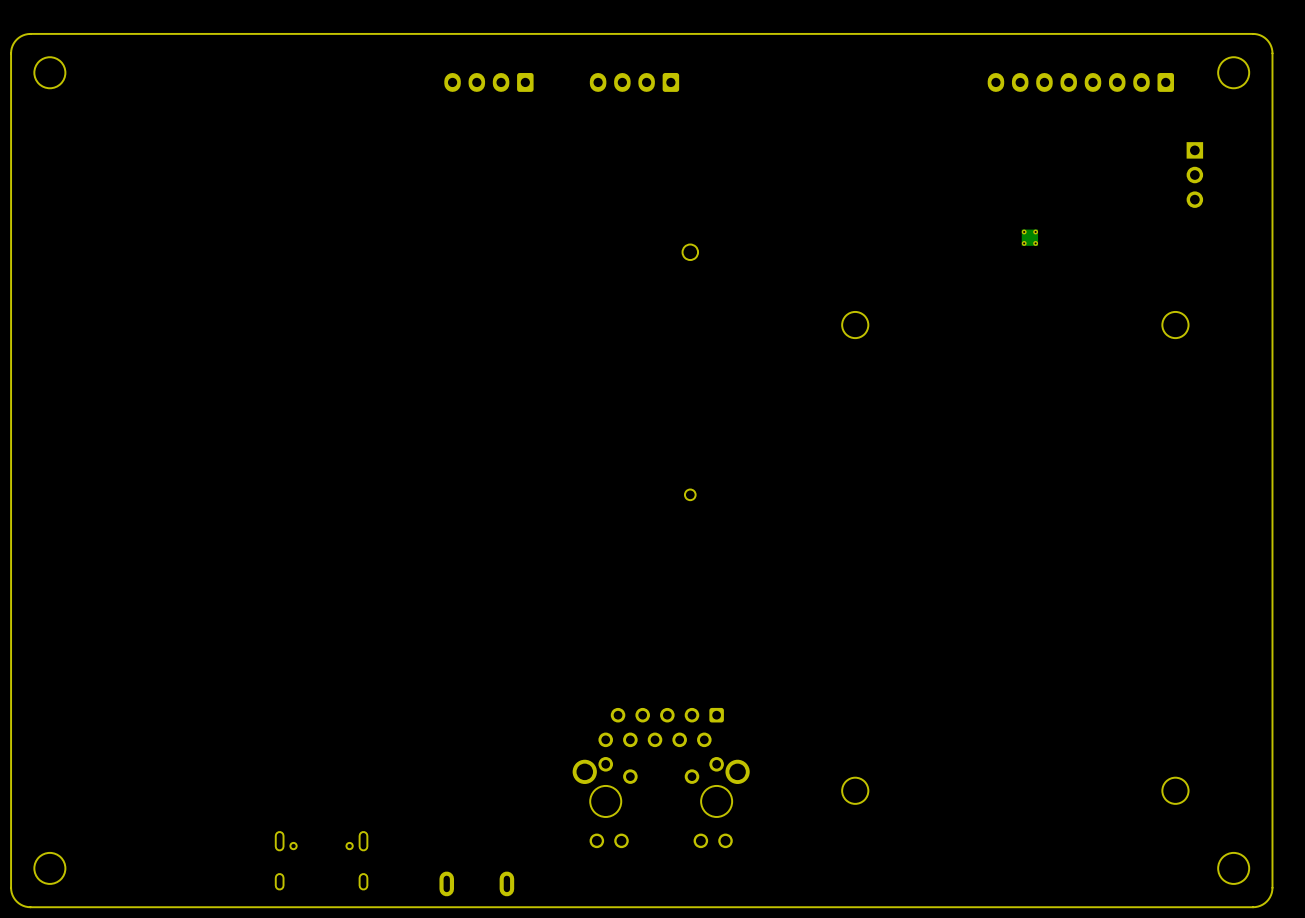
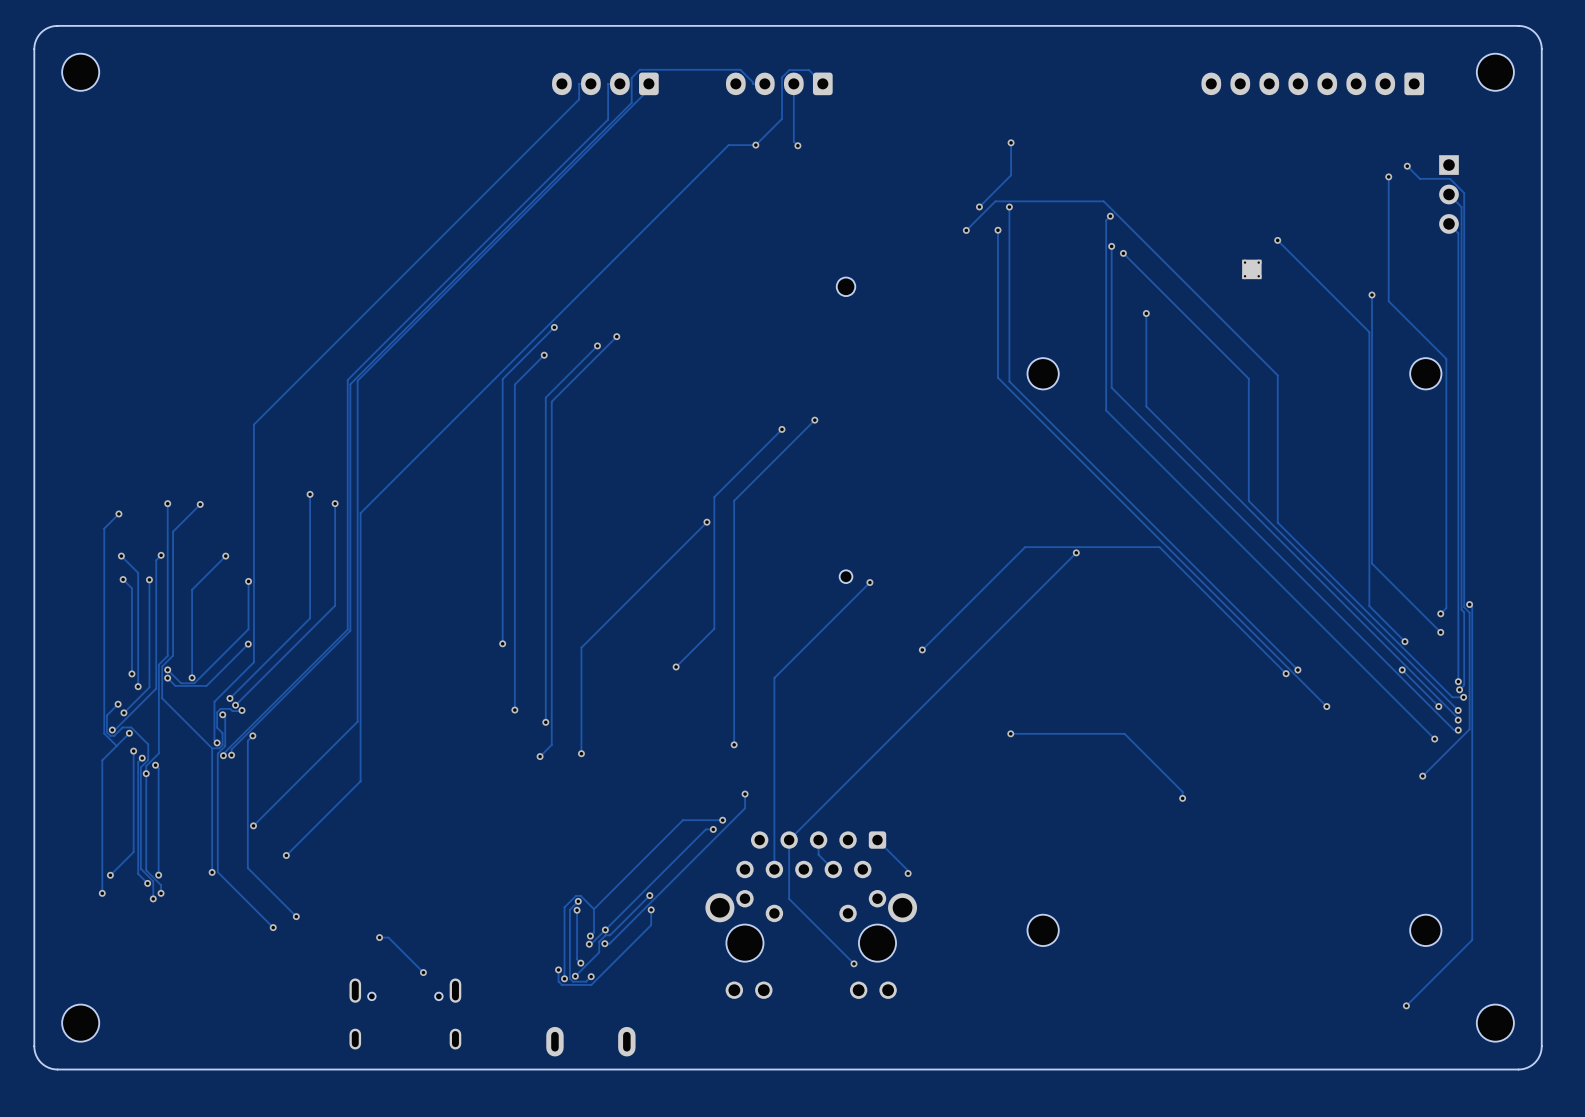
track: none -> (590, 83) (579, 83) (579, 99) (253, 424) (253, 662) (214, 701) (214, 740) (217, 742)
track: none -> (619, 83) (608, 83) (608, 119) (347, 380) (347, 629) (223, 755)
track: none -> (648, 83) (648, 89) (357, 380) (357, 721) (253, 825)
track: none -> (764, 83) (753, 83) (740, 69) (639, 69) (631, 77) (631, 102) (350, 384) (350, 630) (231, 749) (231, 755)
track: none -> (793, 83) (793, 141) (797, 145)
track: none -> (822, 83) (809, 70) (789, 70) (782, 77) (782, 118) (755, 145) (728, 145) (360, 513) (360, 781) (286, 855)
track: none -> (1011, 142) (1011, 175) (979, 206)
via: none -> (1011, 142)
via: none -> (755, 145)
via: none -> (797, 145)
track: none -> (1407, 166) (1419, 178) (1450, 178) (1464, 193) (1464, 607) (1469, 612) (1469, 729) (1422, 776)
via: none -> (1407, 166)
track: none -> (1388, 176) (1388, 301) (1446, 358) (1446, 608) (1440, 613)
via: none -> (1388, 176)
track: none -> (1449, 194) (1461, 207) (1461, 609) (1464, 612) (1464, 685) (1459, 689)
via: none -> (979, 206)
track: none -> (1009, 207) (1009, 381) (1297, 669)
via: none -> (1009, 207)
track: none -> (1110, 216) (1106, 220) (1106, 410) (1434, 739)
via: none -> (1110, 216)
track: none -> (1449, 223) (1458, 233) (1458, 681)
track: none -> (997, 230) (997, 377) (1326, 706)
via: none -> (997, 230)
track: none -> (966, 230) (995, 201) (1103, 201) (1277, 375) (1277, 522) (1452, 697) (1463, 697)
via: none -> (966, 230)
track: none -> (1277, 240) (1369, 332) (1369, 606) (1404, 641)
via: none -> (1277, 240)
track: none -> (1111, 246) (1111, 387) (1454, 730) (1458, 730)
via: none -> (1111, 246)
track: none -> (1123, 253) (1248, 378) (1248, 501) (1458, 710)
via: none -> (1123, 253)
track: none -> (1372, 295) (1372, 563) (1440, 632)
via: none -> (1371, 295)
track: none -> (1146, 313) (1146, 406) (1458, 720)
via: none -> (1146, 313)
track: none -> (554, 327) (502, 379) (502, 643)
via: none -> (554, 327)
track: none -> (616, 336) (551, 401) (551, 744) (540, 756)
via: none -> (616, 336)
track: none -> (597, 345) (545, 397) (545, 722)
via: none -> (597, 345)
track: none -> (544, 355) (514, 384) (514, 710)
via: none -> (544, 355)
track: none -> (814, 420) (734, 500) (734, 744)
via: none -> (814, 420)
track: none -> (781, 429) (714, 497) (714, 628) (676, 666)
via: none -> (781, 429)
track: none -> (310, 494) (310, 618) (229, 698)
via: none -> (310, 494)
track: none -> (167, 503) (167, 655) (158, 664) (158, 753) (146, 766) (146, 870) (161, 885) (161, 893)
via: none -> (167, 503)
track: none -> (335, 503) (335, 605) (235, 705)
via: none -> (335, 503)
track: none -> (200, 504) (173, 531) (173, 655) (162, 666) (162, 698) (212, 748)
via: none -> (200, 504)
track: none -> (118, 513) (104, 528) (104, 733) (116, 745)
via: none -> (118, 513)
track: none -> (706, 522) (581, 647) (581, 753)
via: none -> (706, 522)
track: none -> (1076, 552) (789, 840) (789, 898) (854, 963)
via: none -> (1076, 552)
track: none -> (161, 555) (156, 560) (156, 688) (114, 730) (112, 730)
via: none -> (161, 555)
track: none -> (121, 556) (138, 572) (138, 686)
via: none -> (121, 556)
track: none -> (225, 556) (192, 589) (192, 677)
via: none -> (225, 556)
track: none -> (123, 579) (131, 588) (131, 673)
via: none -> (123, 579)
track: none -> (149, 579) (149, 687) (123, 712)
via: none -> (149, 579)
track: none -> (248, 581) (248, 629) (194, 683) (181, 683) (167, 669)
via: none -> (248, 581)
track: none -> (869, 582) (774, 678) (774, 869)
via: none -> (869, 582)
track: none -> (1469, 604) (1472, 607) (1472, 940) (1406, 1005)
via: none -> (1469, 604)
via: none -> (1440, 613)
via: none -> (1440, 632)
via: none -> (1404, 641)
via: none -> (502, 643)
track: none -> (248, 644) (206, 685) (175, 685) (167, 678)
via: none -> (248, 644)
track: none -> (922, 649) (1025, 547) (1159, 547) (1286, 673)
via: none -> (922, 649)
via: none -> (676, 666)
via: none -> (167, 669)
via: none -> (1297, 669)
track: none -> (1402, 669) (1438, 706)
via: none -> (1402, 669)
via: none -> (131, 673)
via: none -> (1286, 673)
via: none -> (167, 678)
via: none -> (192, 677)
via: none -> (1458, 681)
via: none -> (138, 686)
via: none -> (1459, 689)
via: none -> (1463, 697)
via: none -> (229, 698)
track: none -> (118, 704) (106, 715) (106, 732) (110, 735) (114, 735) (122, 727) (131, 727) (148, 744) (148, 760) (140, 767) (140, 868) (153, 881) (153, 898)
via: none -> (118, 704)
via: none -> (235, 705)
via: none -> (1326, 706)
via: none -> (1438, 706)
track: none -> (242, 710) (220, 708) (217, 712) (217, 727) (222, 733) (222, 745) (219, 748) (212, 748)
via: none -> (242, 710)
via: none -> (514, 710)
via: none -> (1458, 710)
via: none -> (123, 712)
track: none -> (222, 714) (225, 717) (225, 746) (217, 753) (217, 872) (273, 927)
via: none -> (222, 714)
via: none -> (1458, 720)
via: none -> (545, 722)
via: none -> (112, 730)
via: none -> (1458, 730)
track: none -> (129, 733) (102, 760) (102, 893)
via: none -> (129, 733)
track: none -> (1010, 733) (1124, 733) (1182, 791) (1182, 798)
via: none -> (1010, 733)
track: none -> (252, 735) (247, 740) (247, 868) (296, 916)
via: none -> (252, 735)
via: none -> (1434, 739)
via: none -> (217, 742)
via: none -> (734, 744)
track: none -> (212, 748) (212, 872)
track: none -> (133, 751) (133, 852) (110, 875)
via: none -> (133, 751)
via: none -> (581, 753)
via: none -> (223, 755)
via: none -> (231, 755)
via: none -> (540, 756)
track: none -> (142, 758) (138, 762) (138, 873) (147, 883)
via: none -> (142, 758)
track: none -> (155, 765) (158, 768) (158, 875)
via: none -> (155, 765)
via: none -> (146, 773)
via: none -> (1422, 776)
track: none -> (745, 794) (745, 808) (609, 943) (604, 943)
via: none -> (745, 794)
via: none -> (1182, 798)
track: none -> (722, 820) (682, 820) (593, 909)
via: none -> (722, 820)
via: none -> (253, 825)
track: none -> (713, 829) (705, 829) (589, 944)
via: none -> (713, 829)
track: none -> (818, 840) (818, 854) (833, 869)
track: none -> (877, 840) (908, 870) (908, 873)
via: none -> (286, 855)
via: none -> (212, 872)
via: none -> (908, 873)
via: none -> (110, 875)
via: none -> (158, 875)
via: none -> (147, 883)
via: none -> (102, 893)
via: none -> (161, 893)
track: none -> (649, 895) (610, 935) (605, 935) (599, 941) (599, 952) (575, 976)
via: none -> (649, 895)
via: none -> (153, 898)
track: none -> (578, 901) (569, 909) (569, 978) (573, 981) (586, 981) (591, 976)
via: none -> (578, 901)
track: none -> (577, 910) (577, 959) (580, 963)
via: none -> (577, 910)
track: none -> (593, 909) (580, 895) (576, 895) (564, 907) (564, 978)
track: none -> (593, 909) (593, 932) (590, 936)
track: none -> (651, 909) (651, 925) (591, 984) (561, 984) (558, 981) (558, 969)
via: none -> (651, 909)
via: none -> (296, 916)
via: none -> (273, 927)
via: none -> (605, 929)
via: none -> (590, 936)
track: none -> (379, 937) (388, 937) (423, 972)
via: none -> (379, 937)
via: none -> (604, 943)
via: none -> (589, 944)
via: none -> (580, 963)
via: none -> (854, 963)
via: none -> (558, 969)
via: none -> (423, 972)
via: none -> (575, 976)
via: none -> (591, 976)
via: none -> (564, 978)
via: none -> (1406, 1005)

